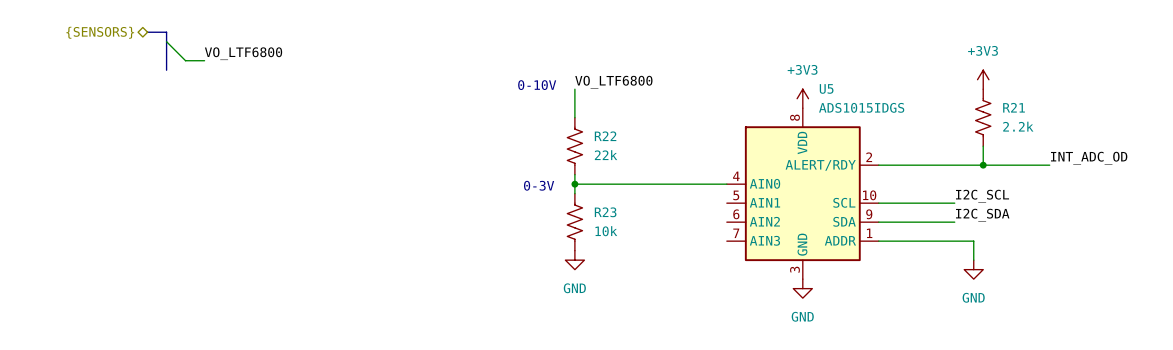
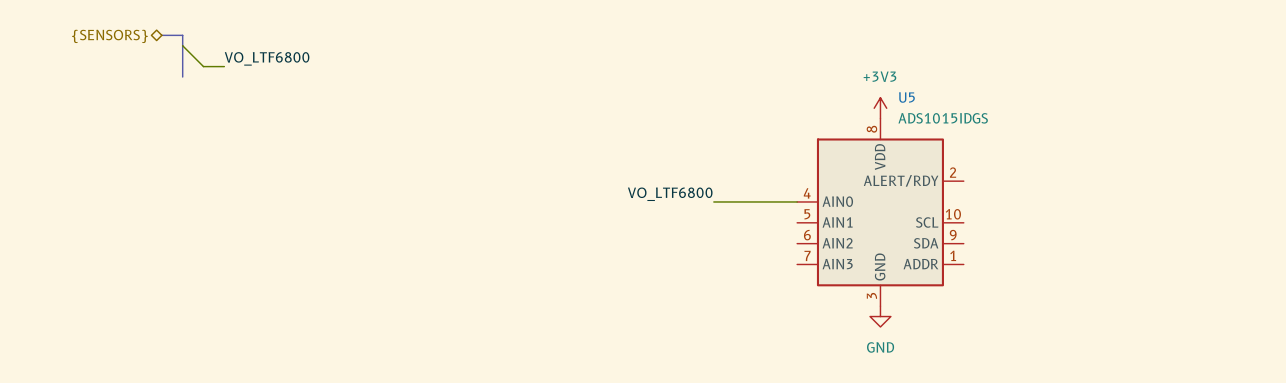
power symbol: +3V3 (983, 79) -> none
label position: VO_LTF6800 (613, 82) -> VO_LTF6800 (670, 194)
text: 0-10V (537, 85) -> none
wire: (574, 89) (574, 117) -> none
R21: 2.2k (983, 117) -> none
R22: 22k (574, 146) -> none
wire: (983, 146) (983, 165) -> none
label: INT_ADC_OD (1089, 158) -> none
wire: (878, 165) (1049, 165) -> none
junction: (983, 165) -> none
wire: (574, 174) (574, 193) -> none
wire: (574, 184) (650, 184) -> none
junction: (574, 184) -> none
text: 0-3V (539, 185) -> none
label: I2C_SCL (982, 196) -> none
wire: (878, 203) (954, 203) -> none
label: I2C_SDA (982, 215) -> none
R23: 10k (574, 222) -> none
wire: (878, 222) (954, 222) -> none
wire: (878, 241) (973, 241) (973, 260) -> none
power symbol: GND (574, 260) -> none
power symbol: GND (973, 269) -> none

